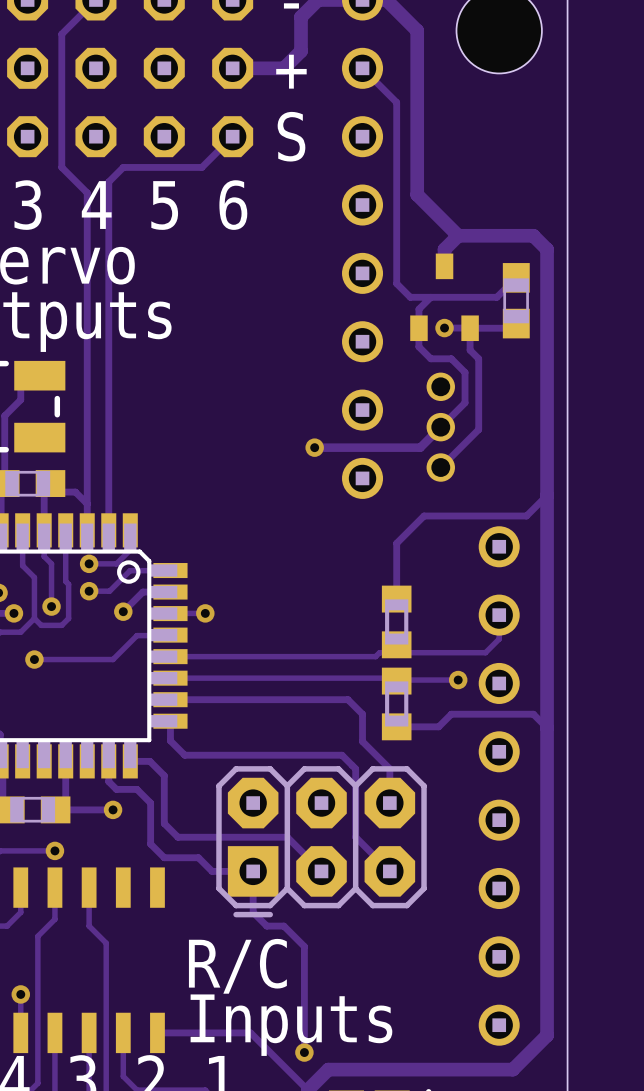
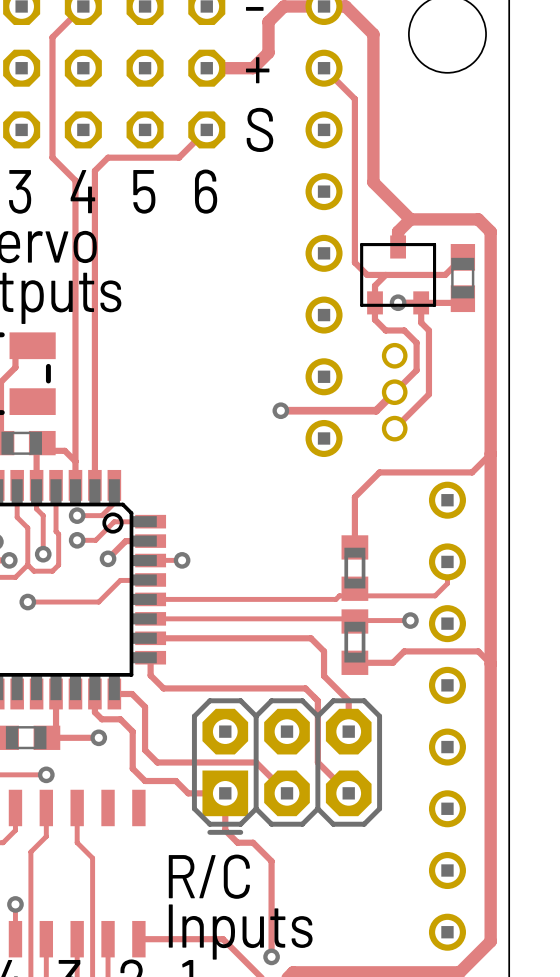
part footprint: [410, 253, 479, 342] -> [360, 235, 437, 315]

